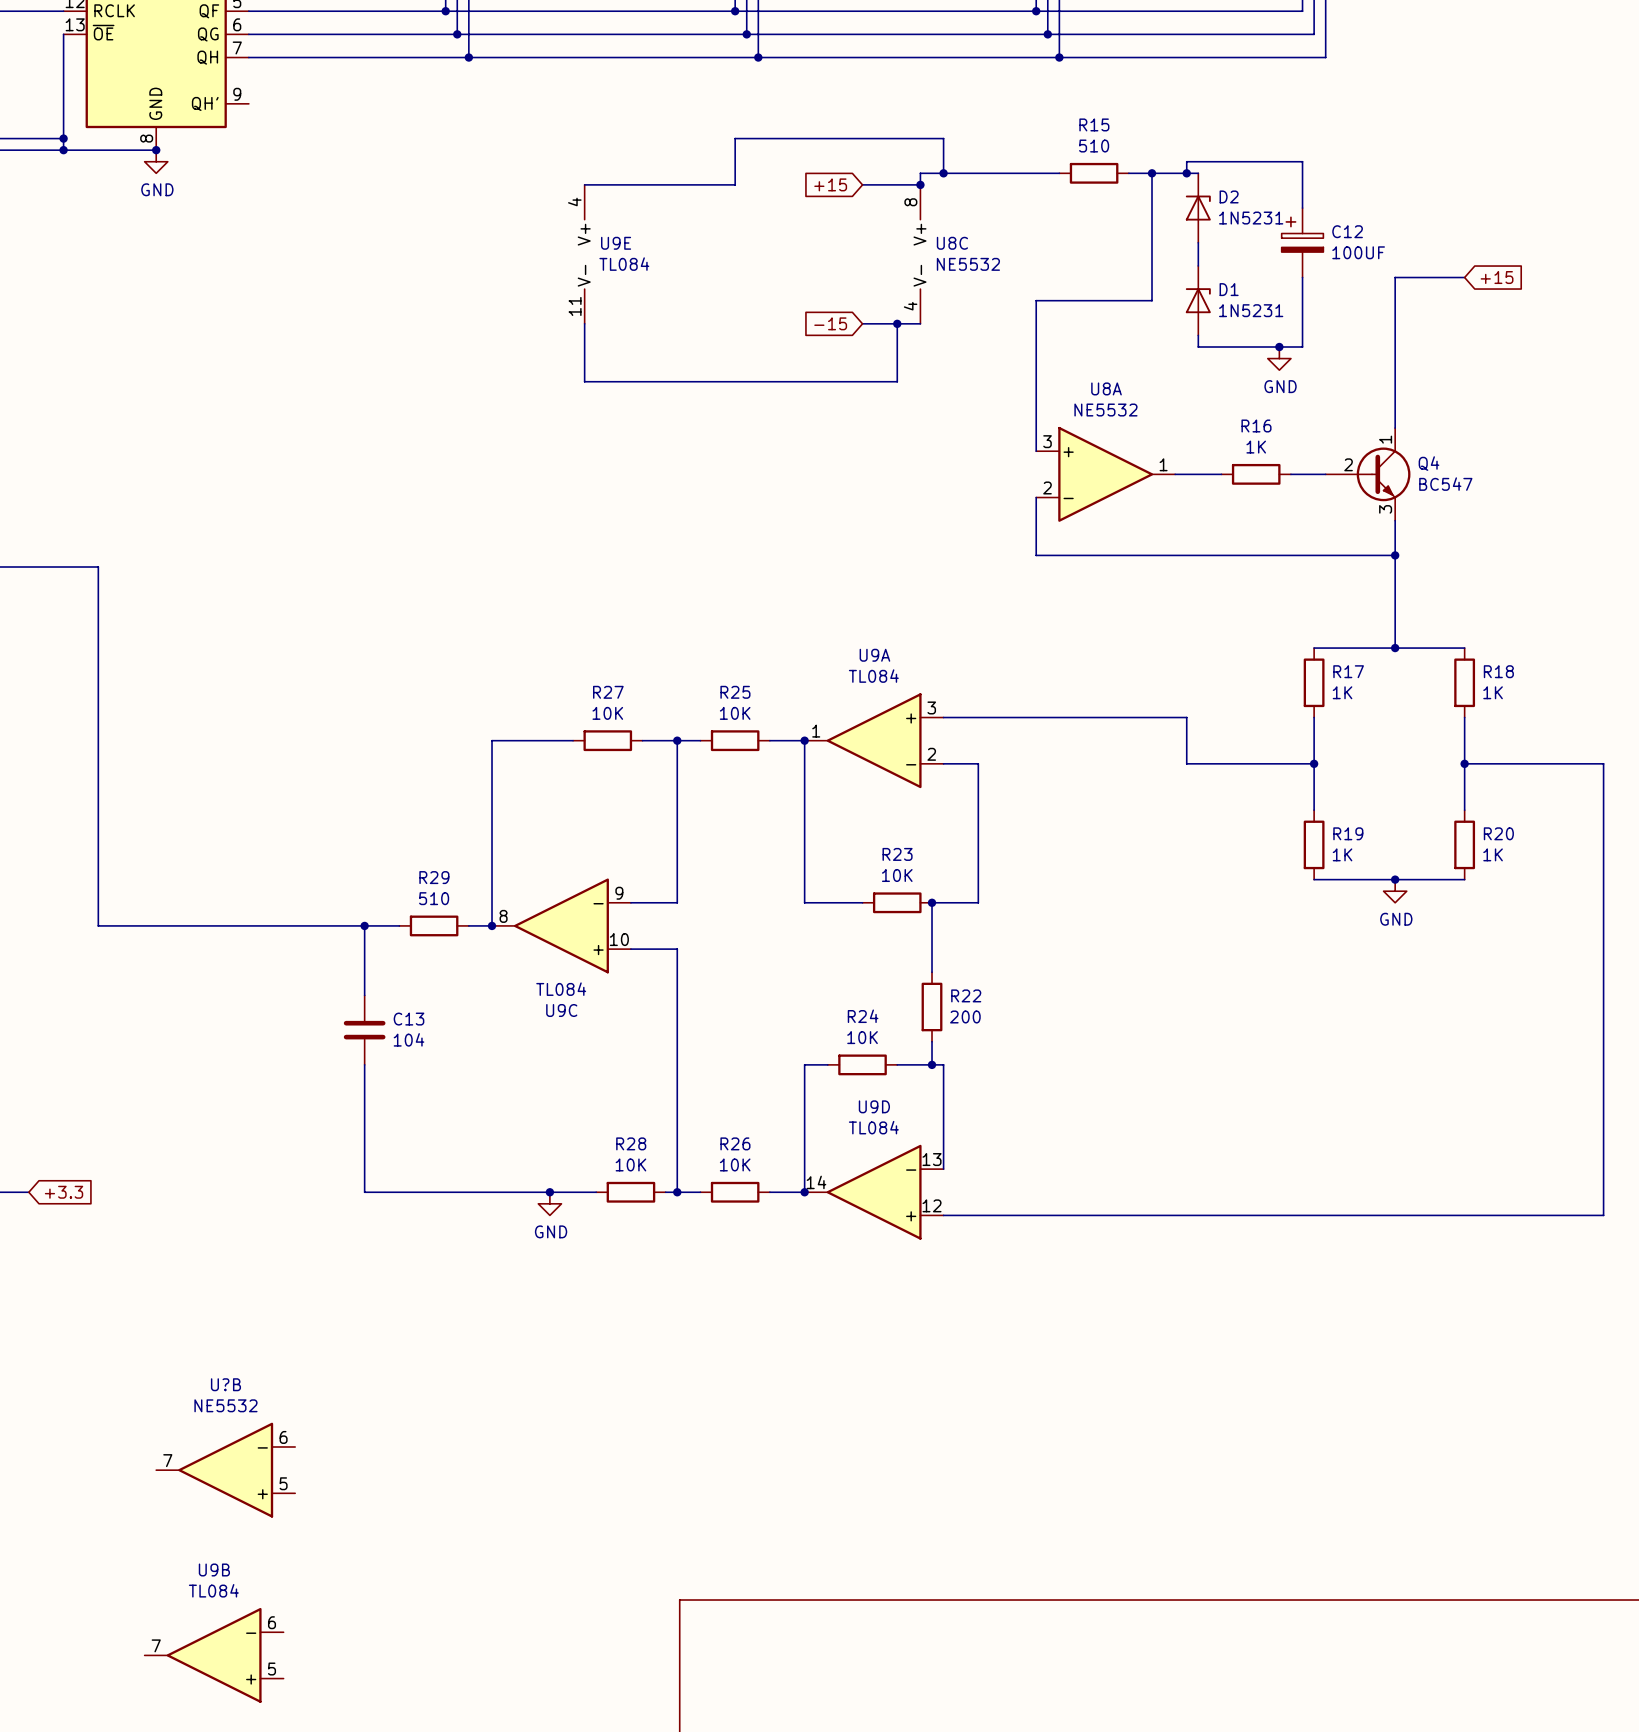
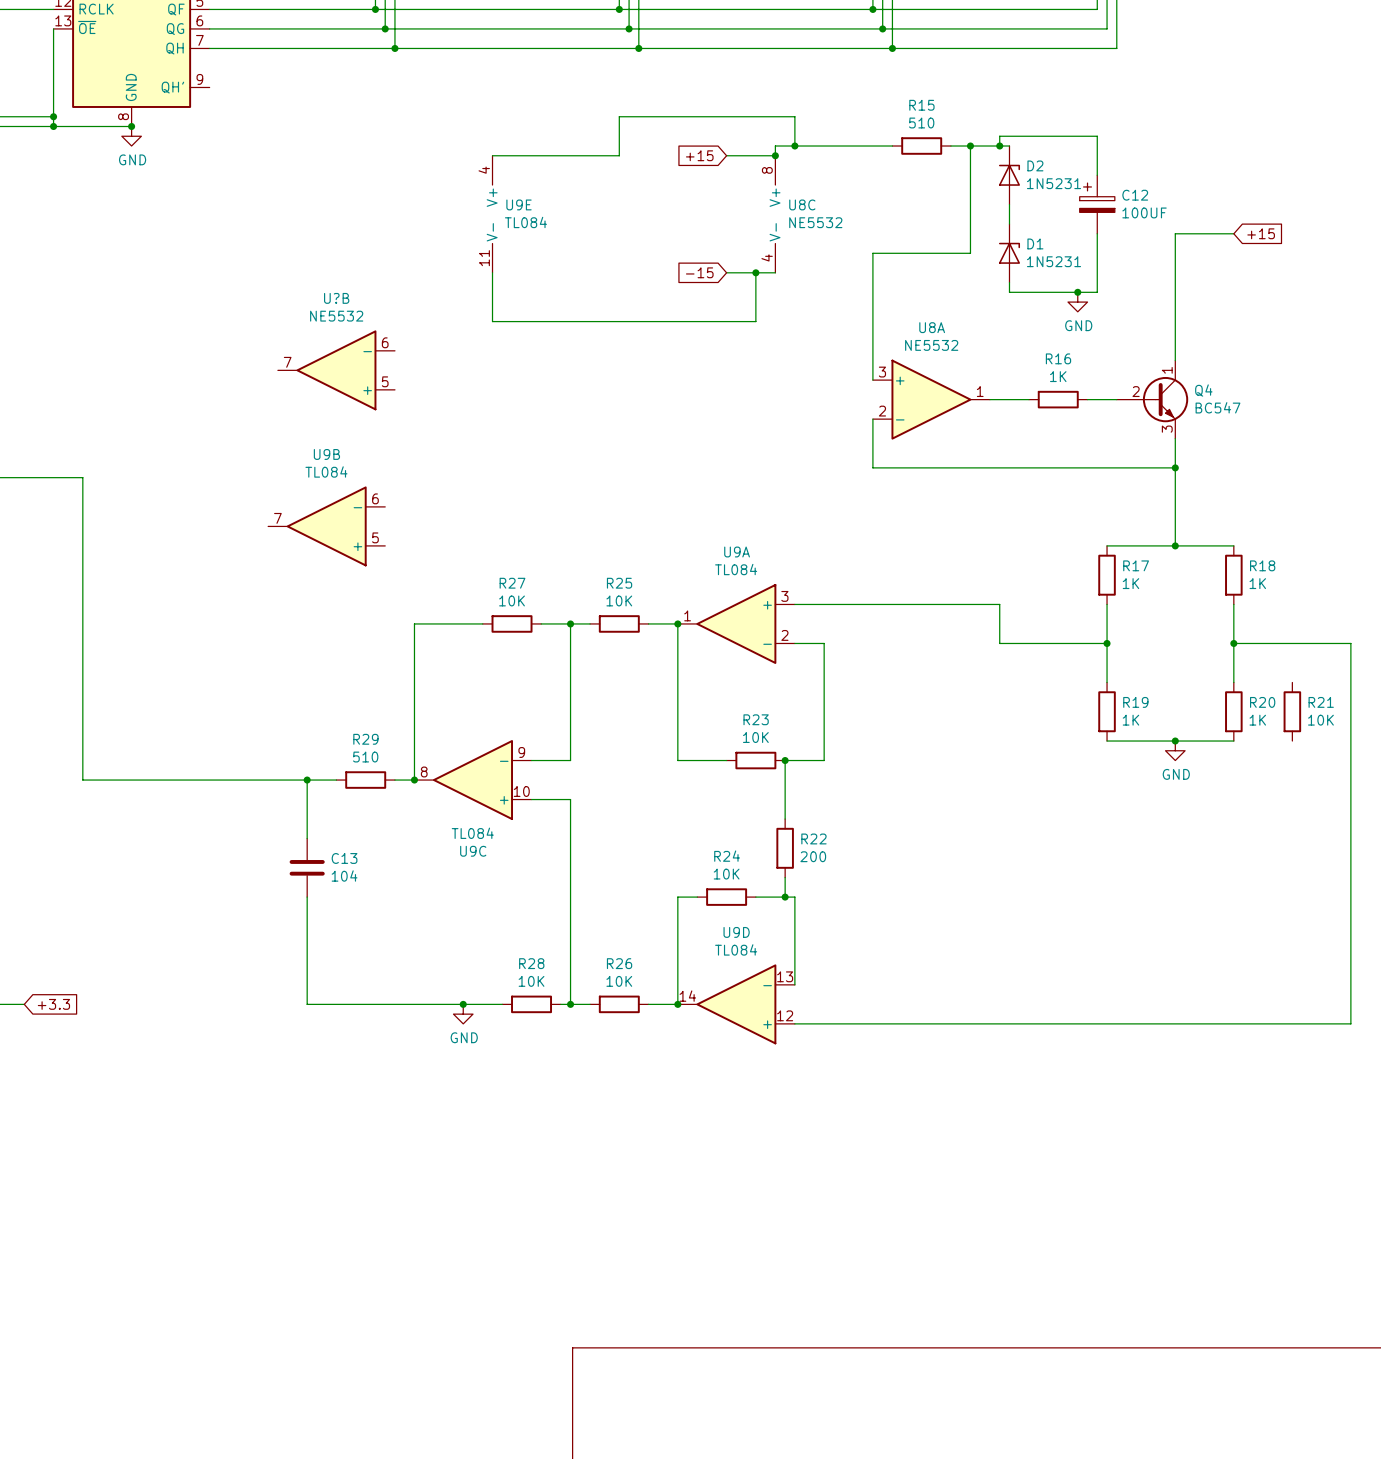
U?B: none -> NE5532 (336, 370)
R21: none -> 10K (1292, 711)
U?B: NE5532 (225, 1470) -> none
U9B position: (214, 1655) -> (326, 526)

